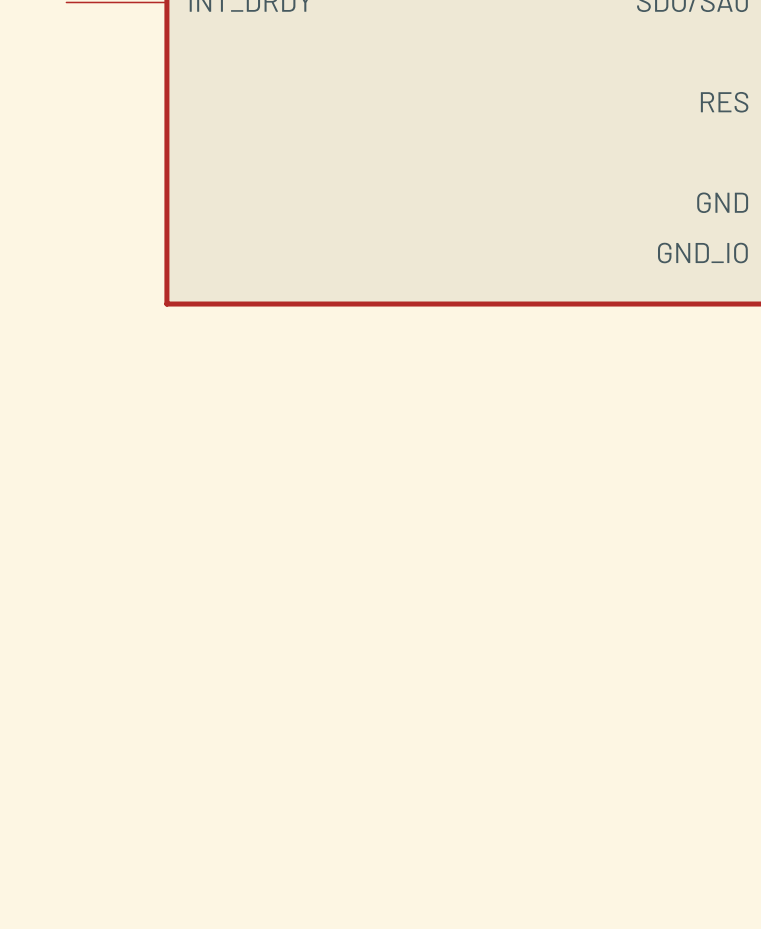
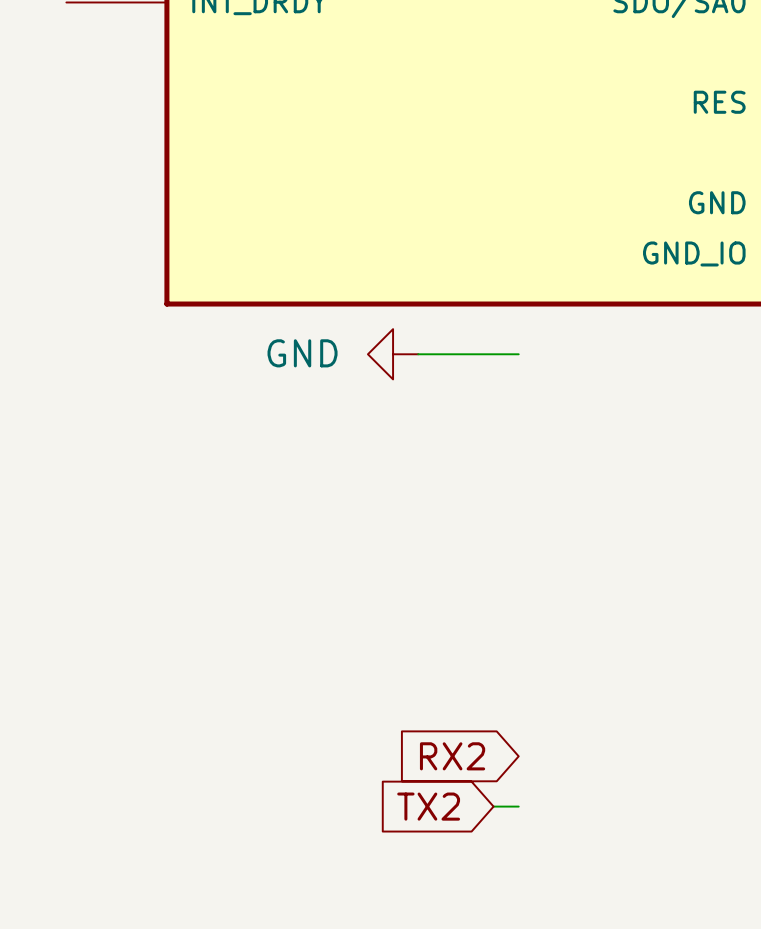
power symbol: none -> GND (393, 354)
wire: none -> (418, 354) (518, 354)
global label: none -> RX2 (452, 756)
global label: none -> TX2 (428, 806)
wire: none -> (493, 806) (518, 806)

